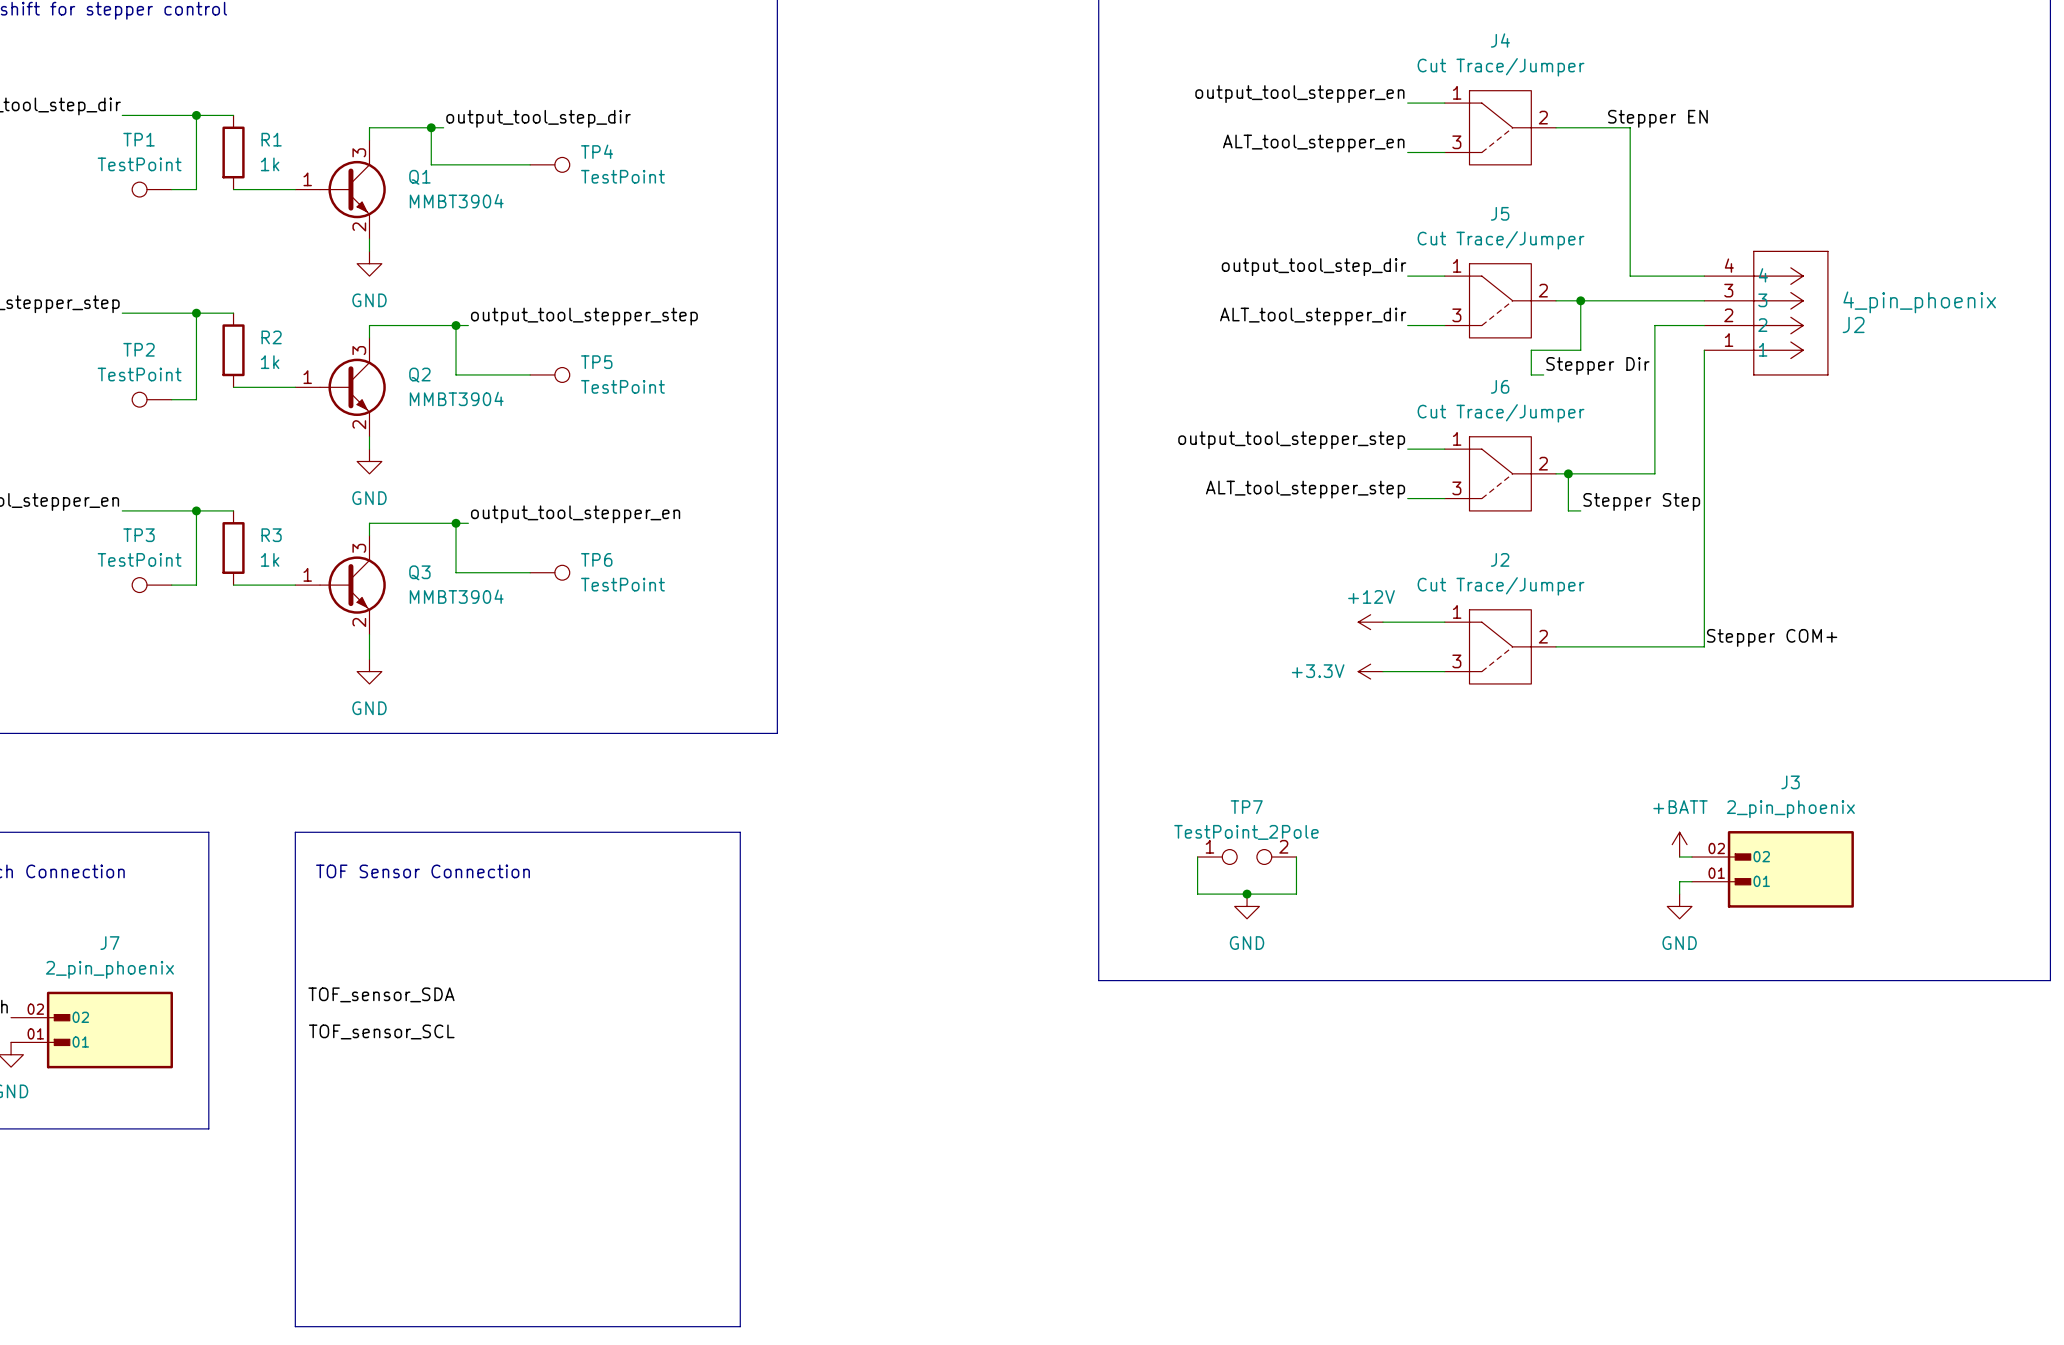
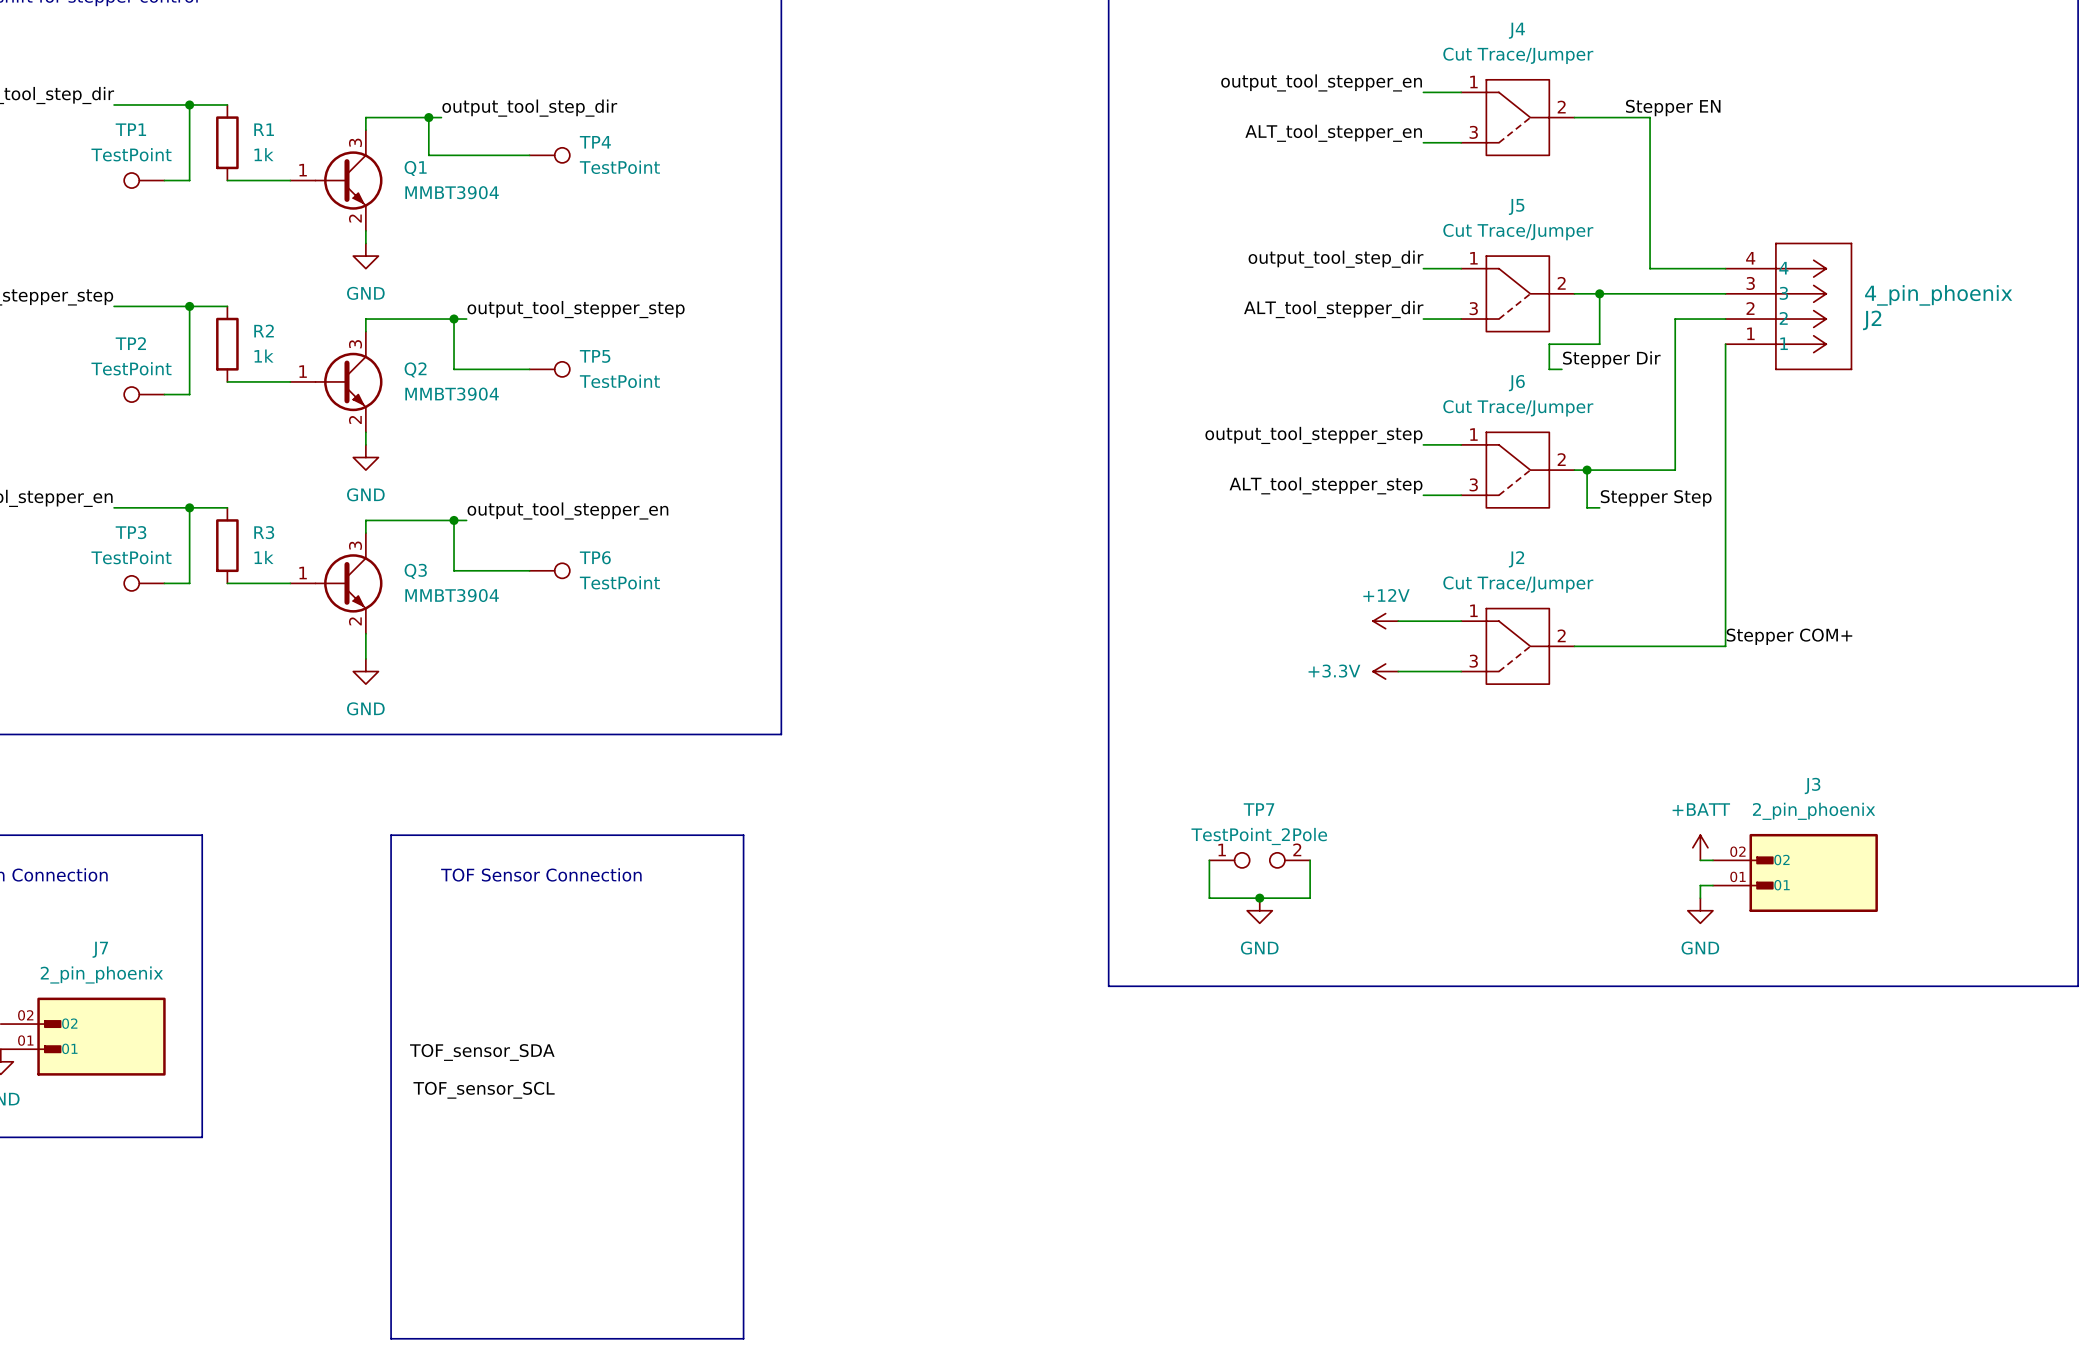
line: (394, 832) (295, 832) (295, 1326) (394, 1326) -> (391, 835) (391, 1338)
text position: TOF Sensor Connection (422, 871) -> TOF Sensor Connection (541, 874)
label position: TOF_sensor_SDA (381, 994) -> TOF_sensor_SDA (482, 1052)
label position: TOF_sensor_SCL (381, 1031) -> TOF_sensor_SCL (484, 1090)

